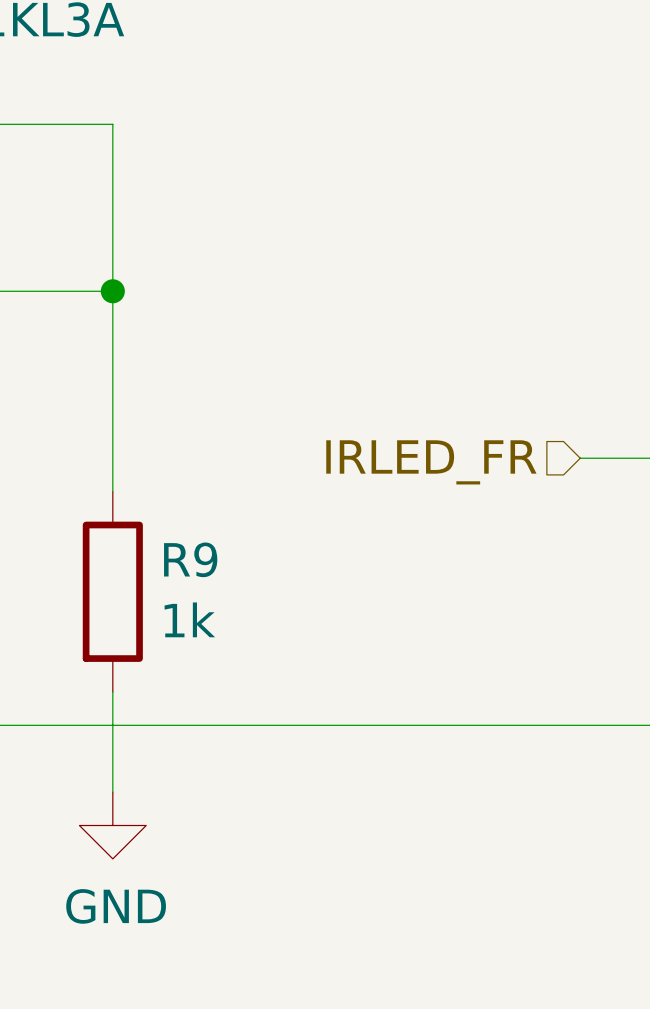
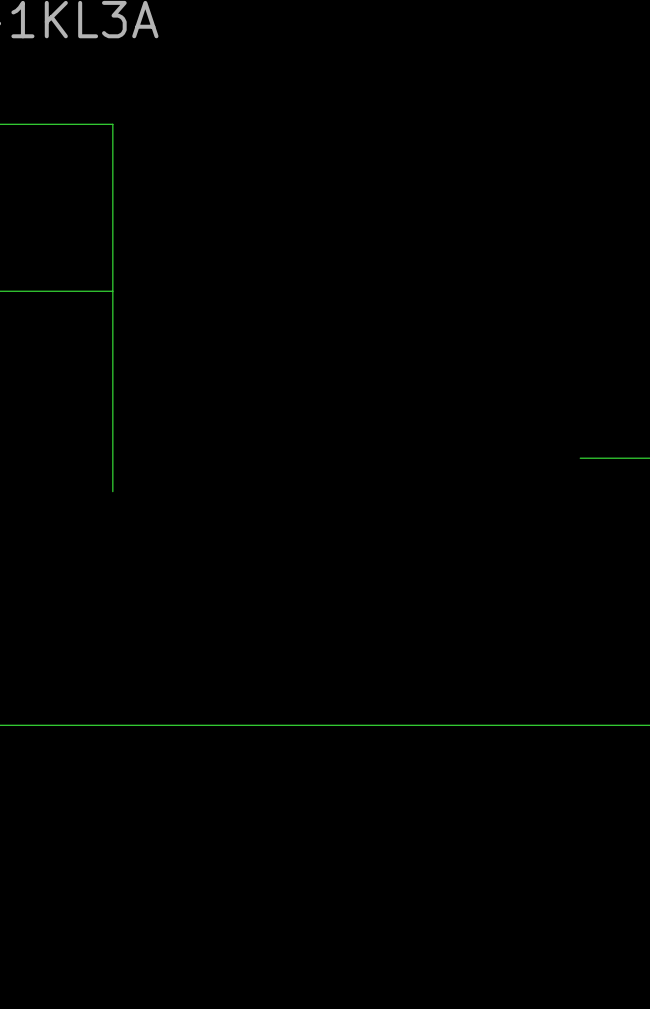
junction: (112, 291) -> none
hierarchical label: IRLED_FR (431, 462) -> none
R9: 1k (112, 591) -> none
wire: (112, 691) (112, 792) -> none
power symbol: GND (112, 825) -> none

